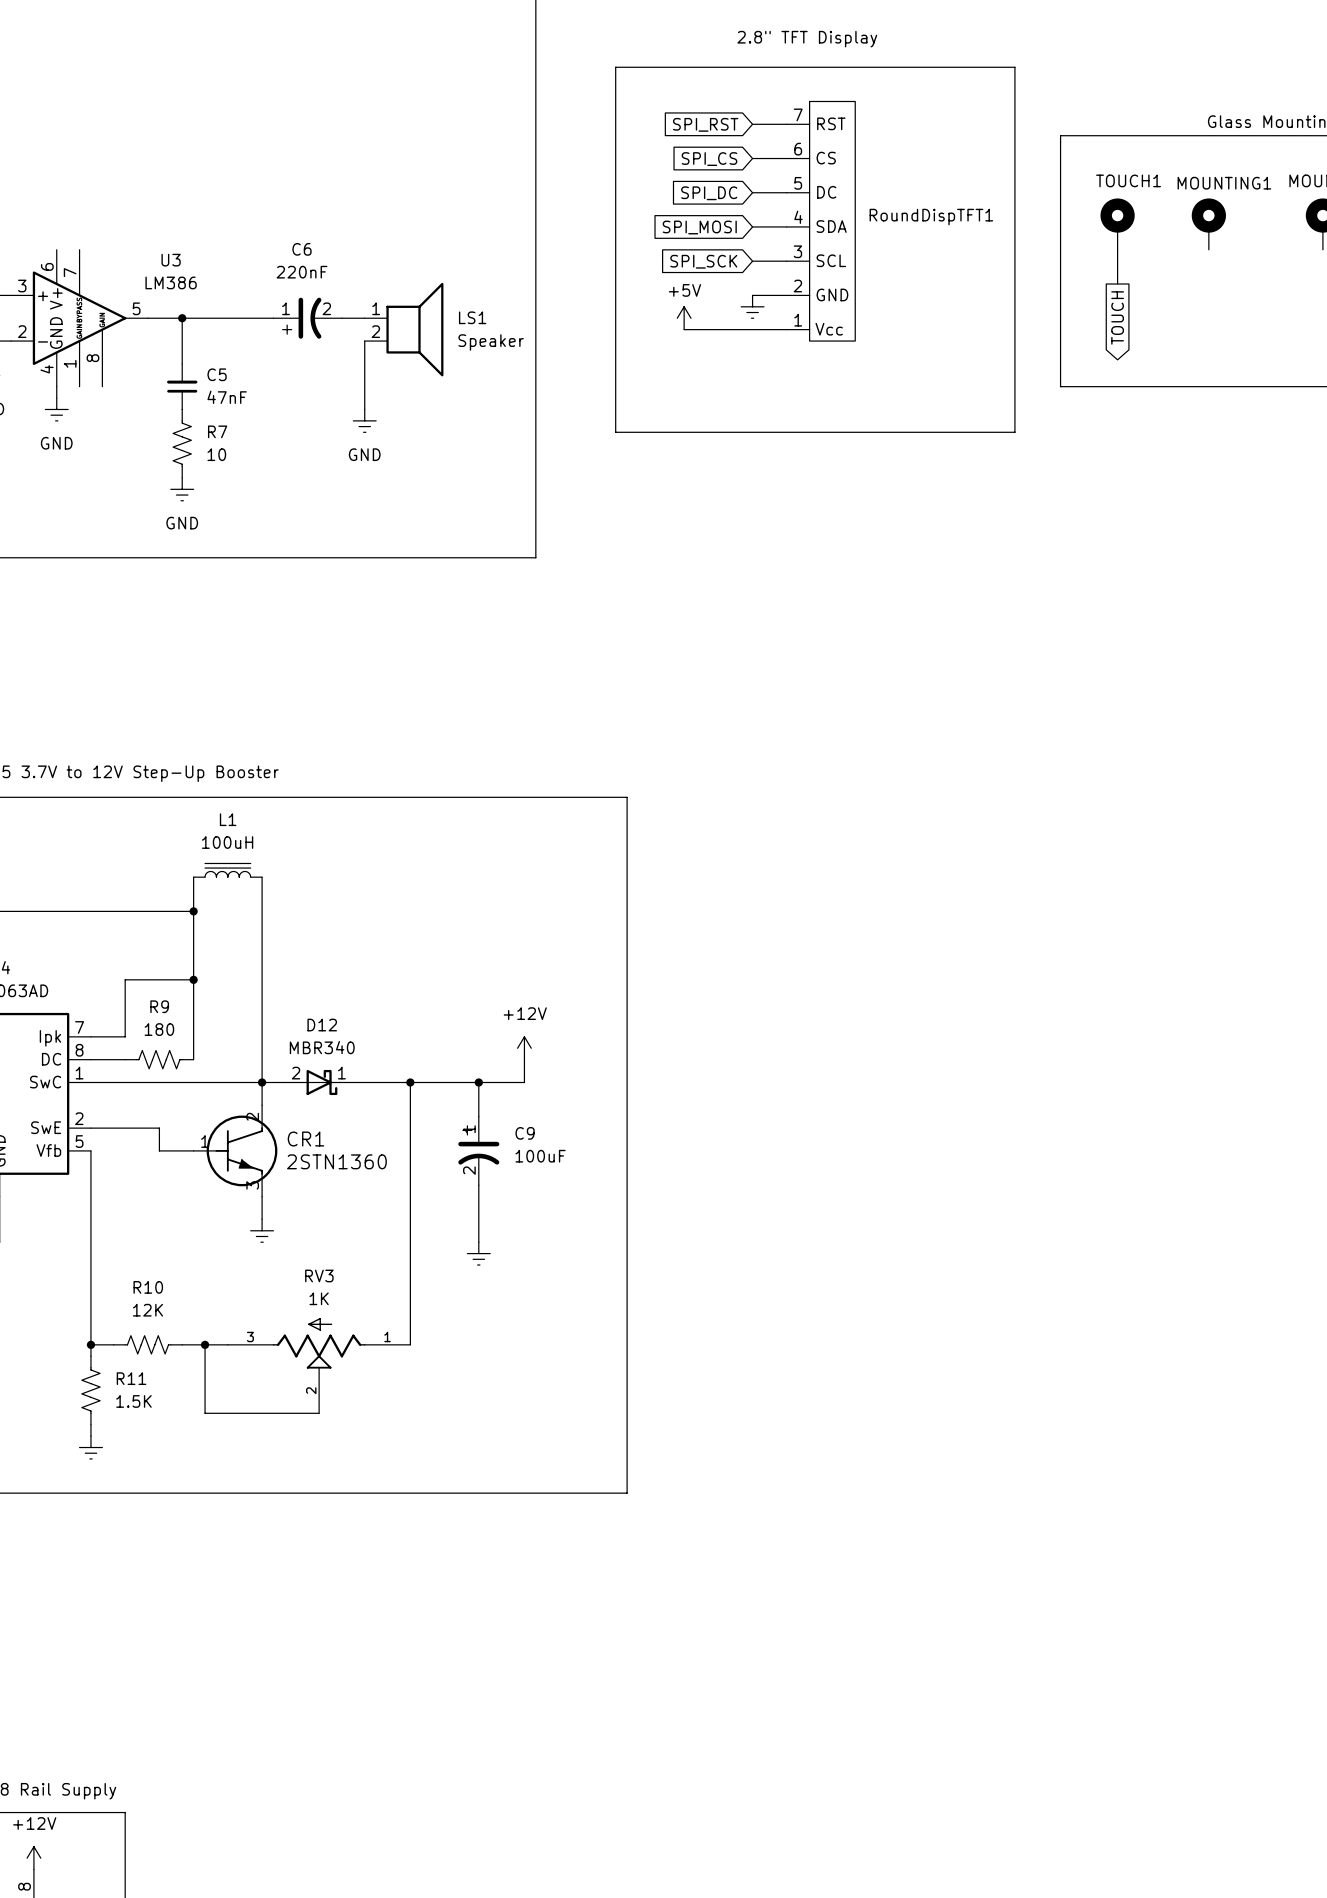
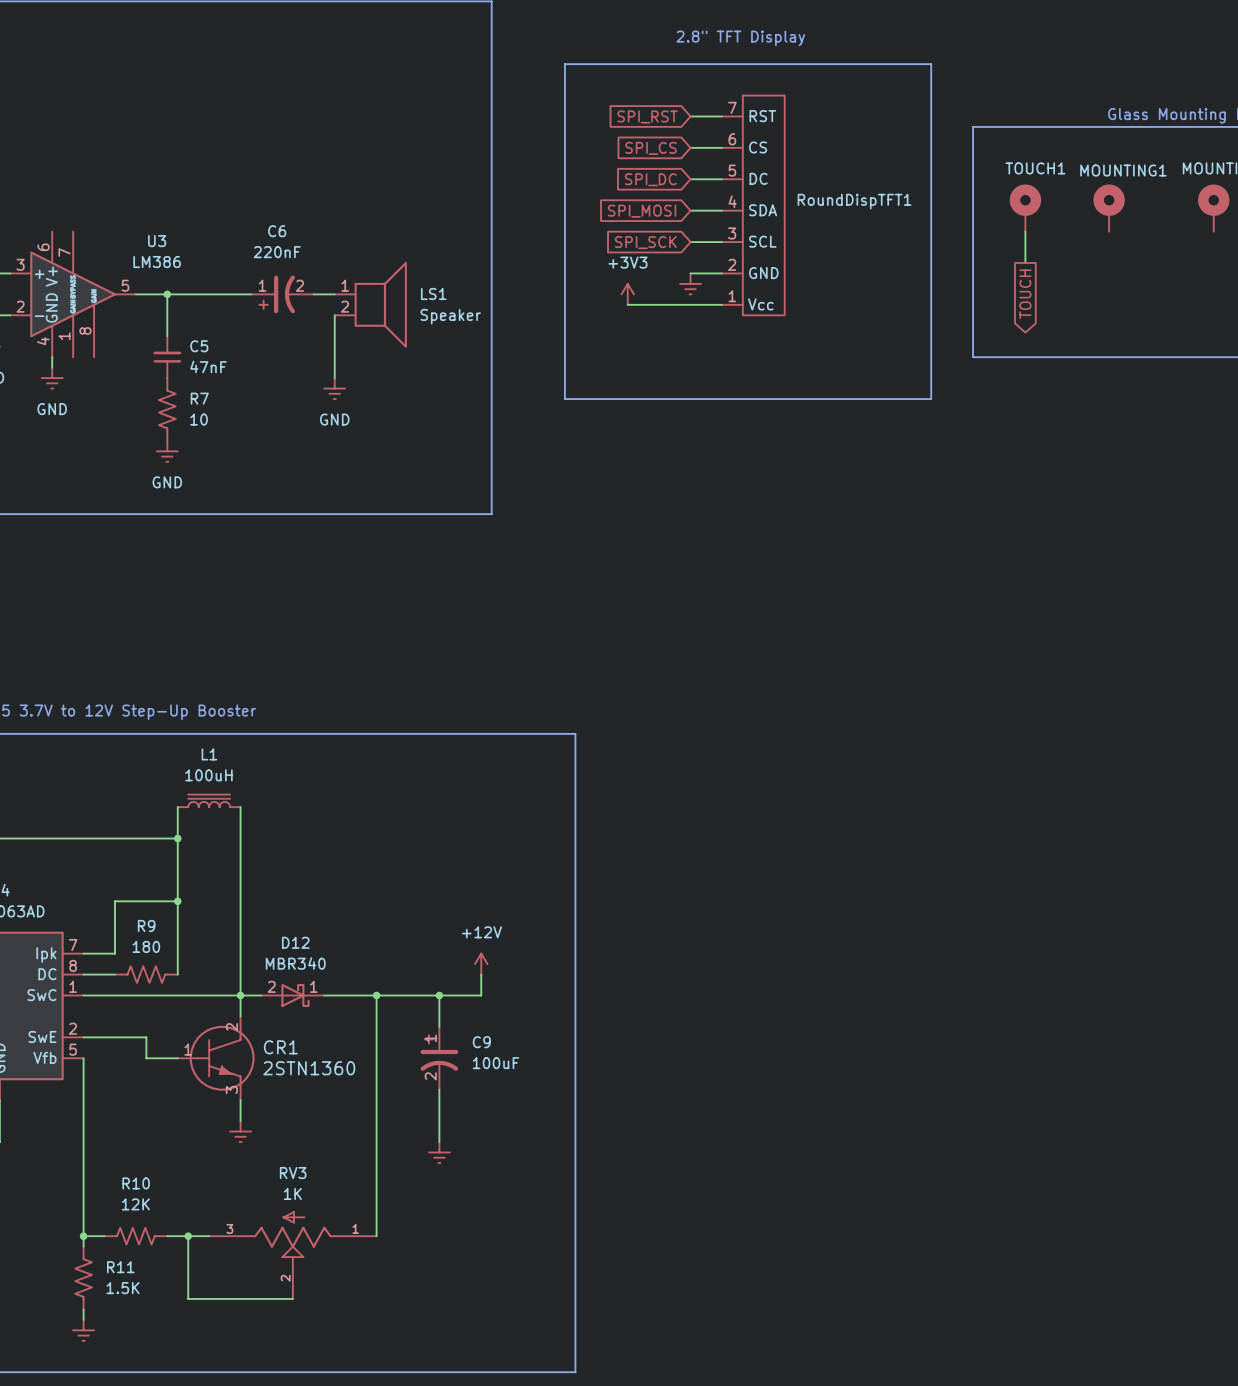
power symbol: +5V (684, 318) -> +3V3 (627, 294)

